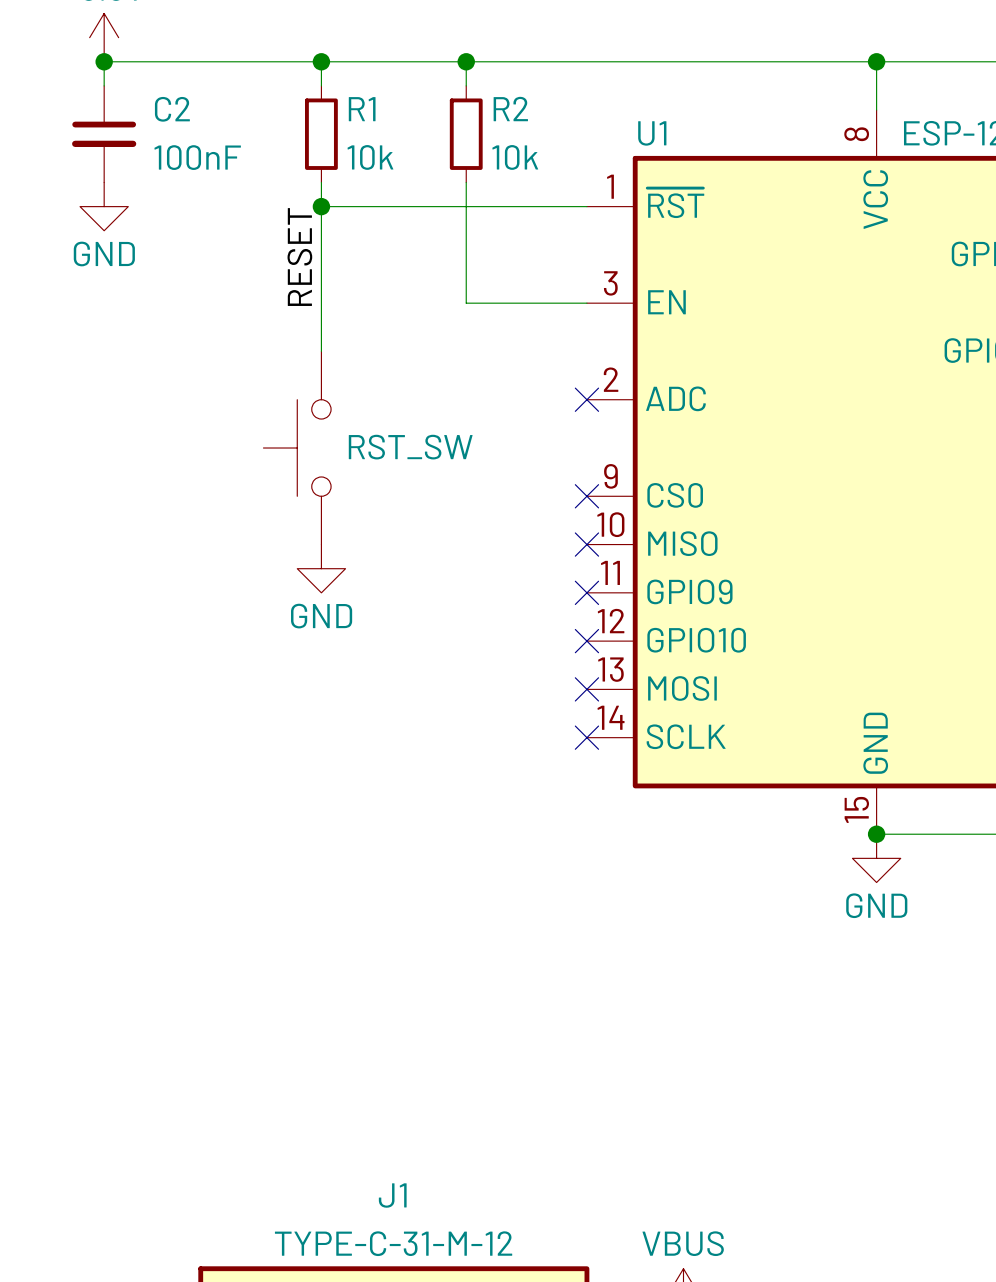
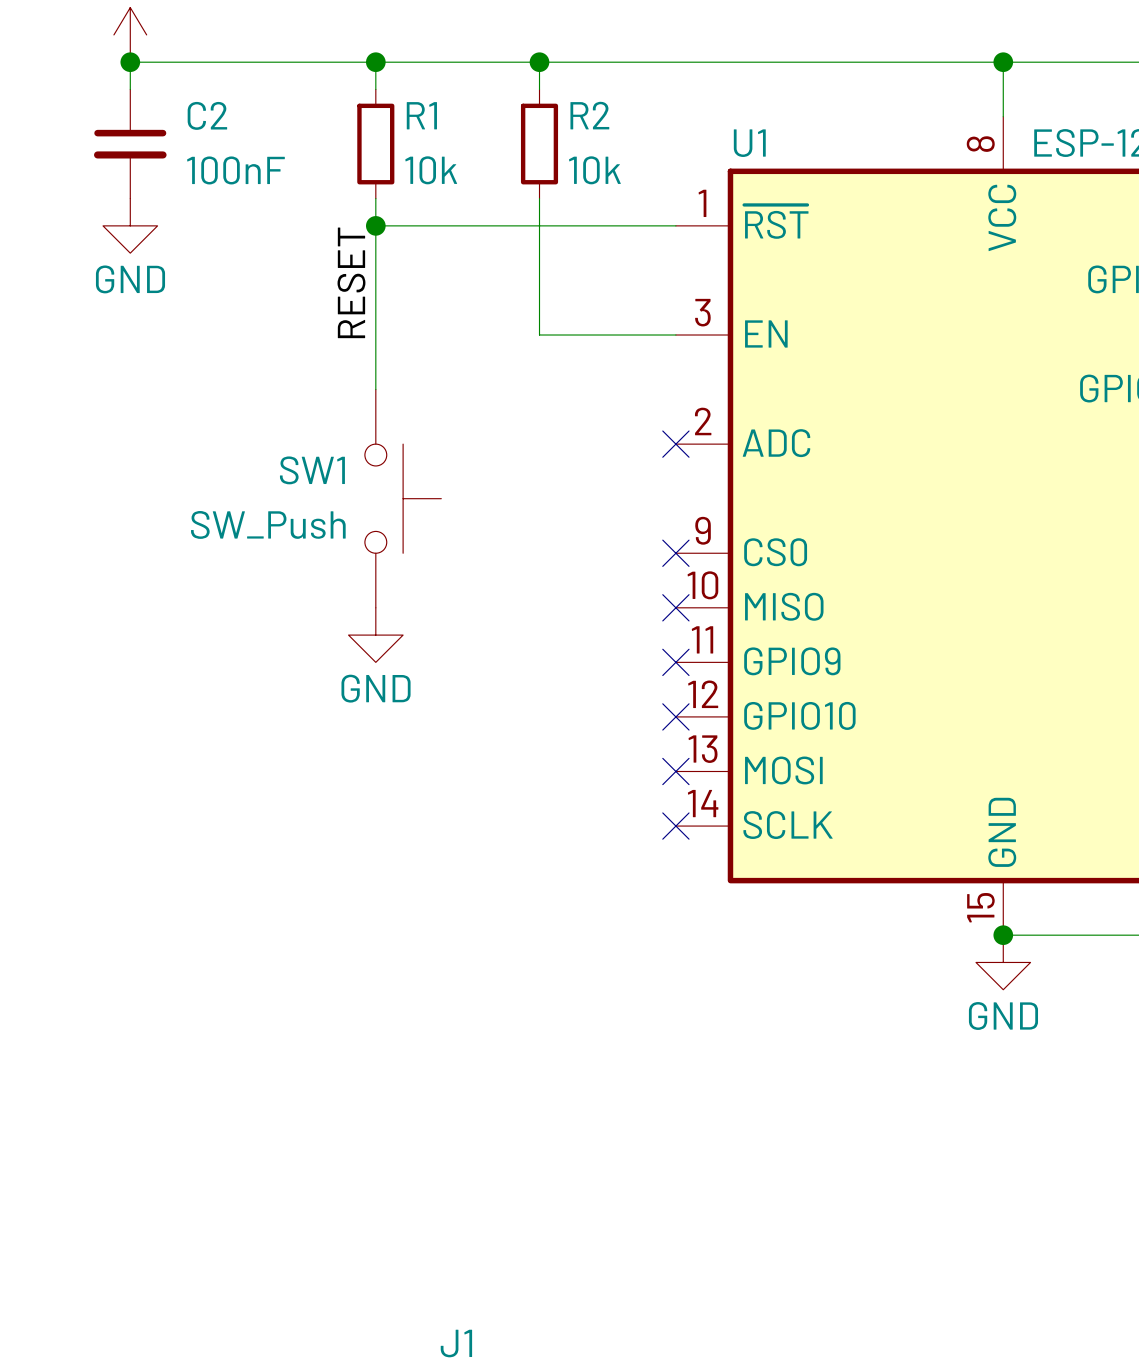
RST_SW: (297, 448) -> none
SW1: none -> SW_Push (403, 498)

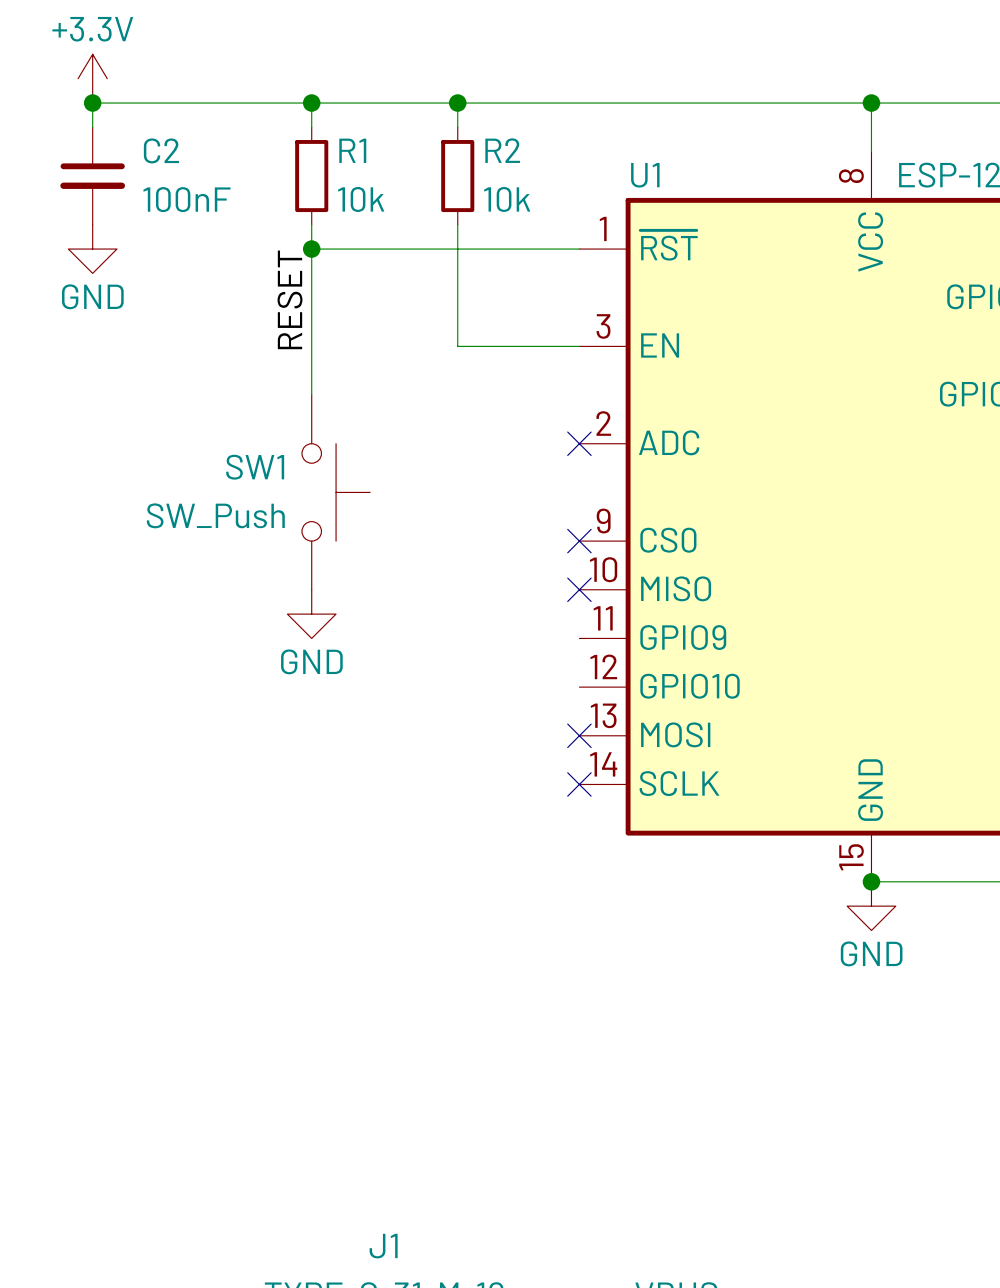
no-connect mark: (675, 662) -> none
no-connect mark: (675, 716) -> none

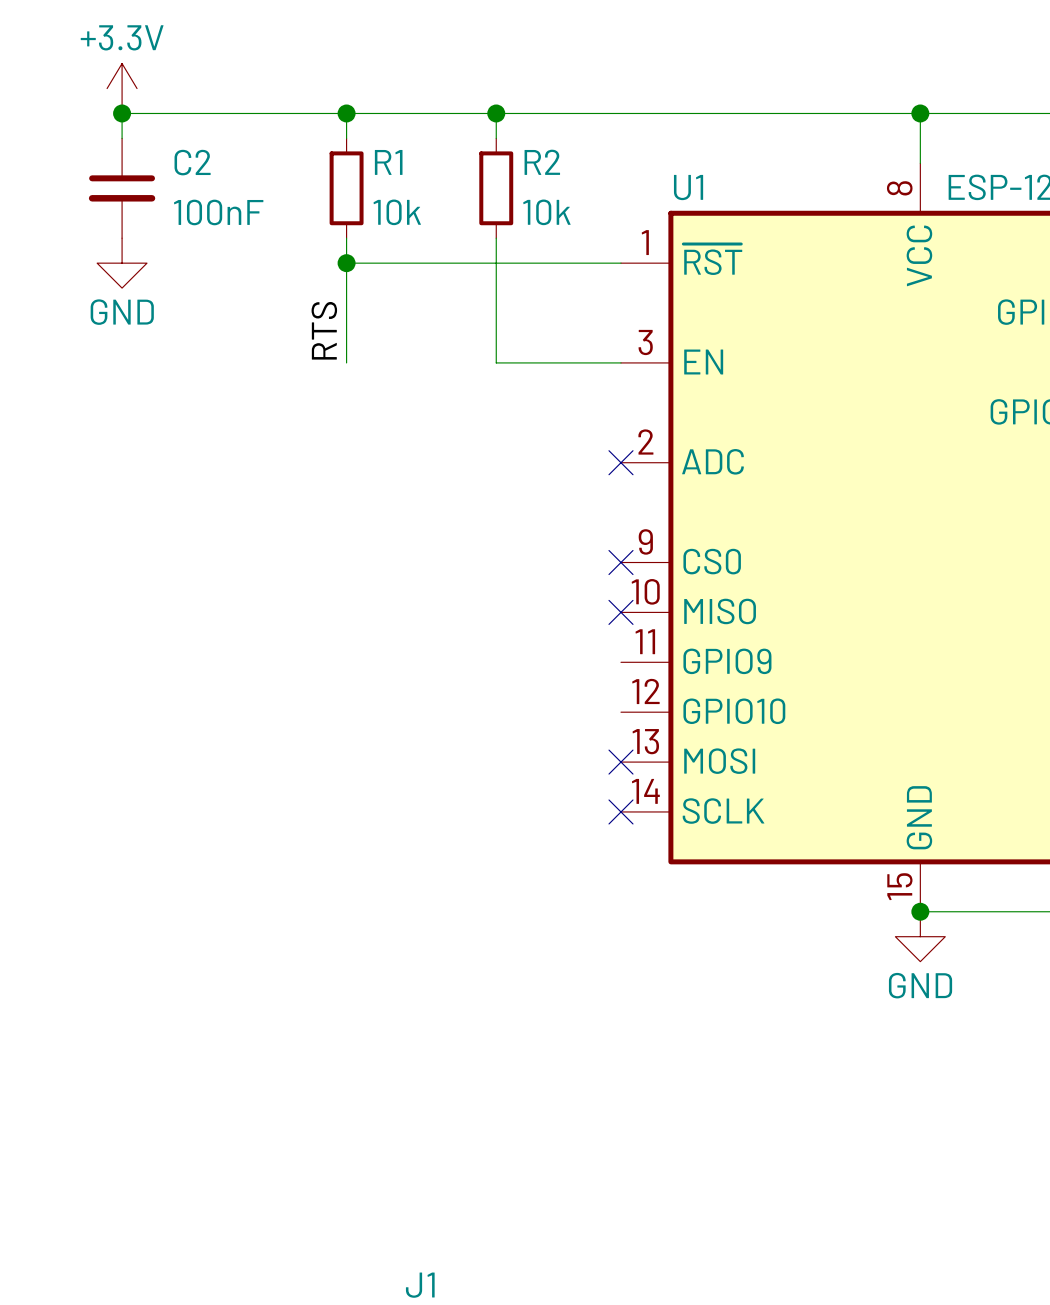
label: RESET (290, 299) -> none
label: none -> RTS (324, 330)
wire: (311, 346) (311, 395) -> none
SW1: SW_Push (336, 492) -> none
power symbol: GND (311, 614) -> none

